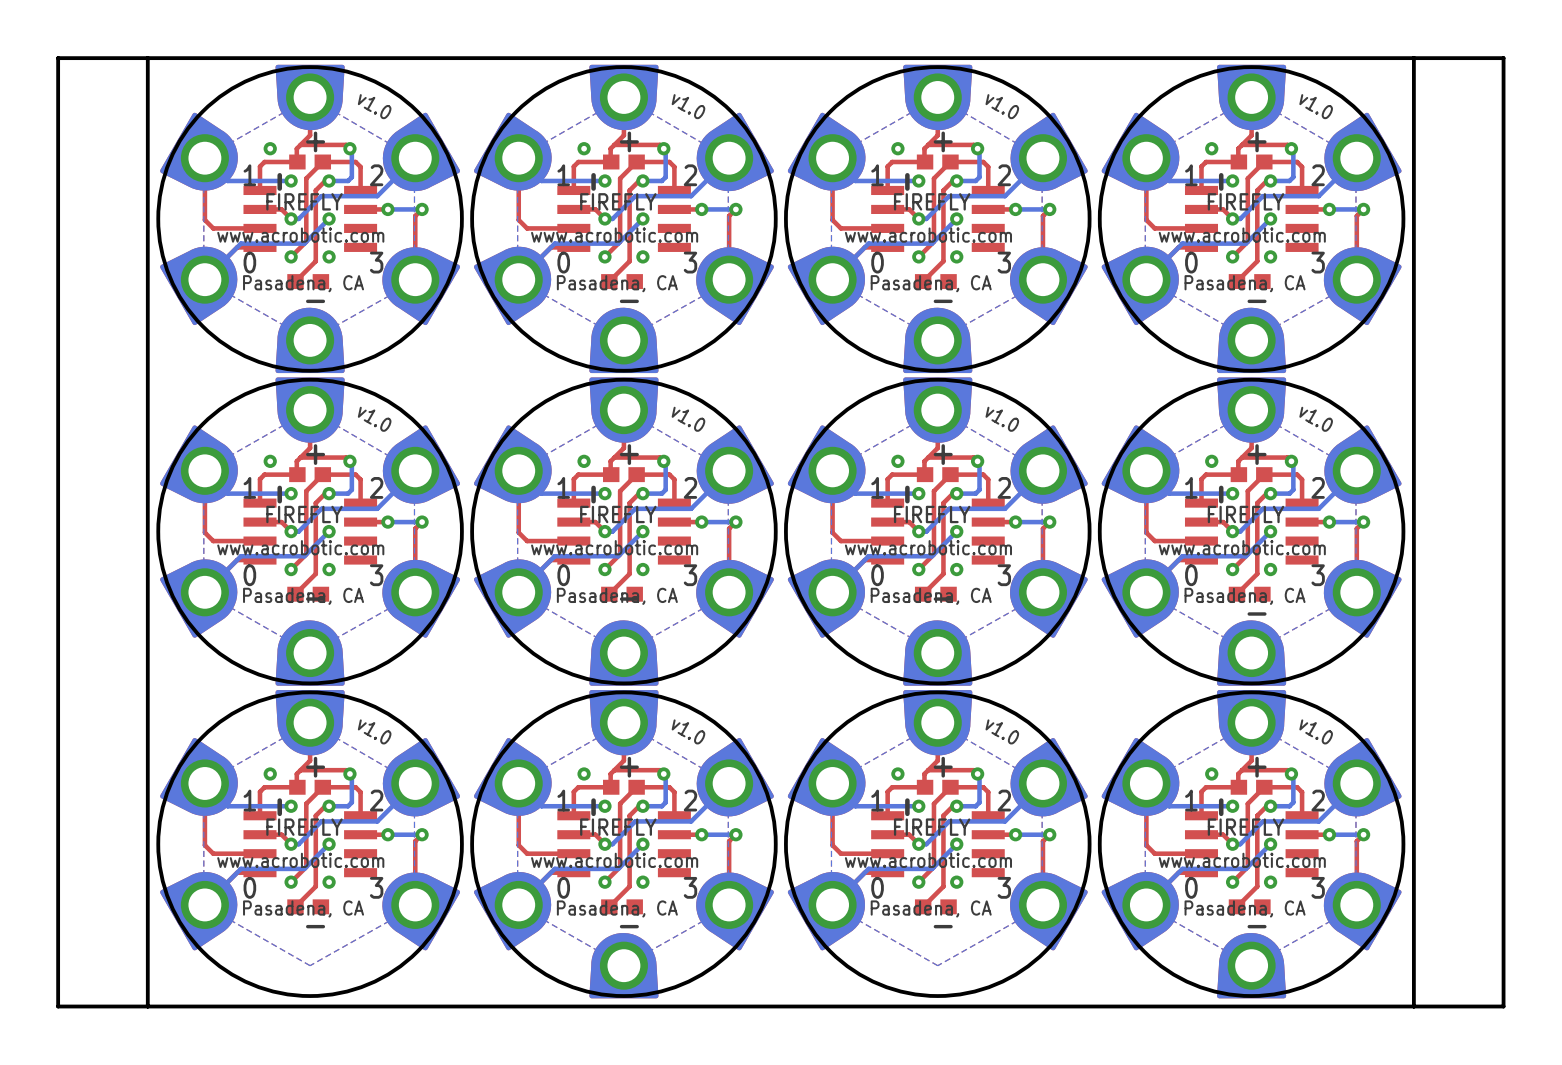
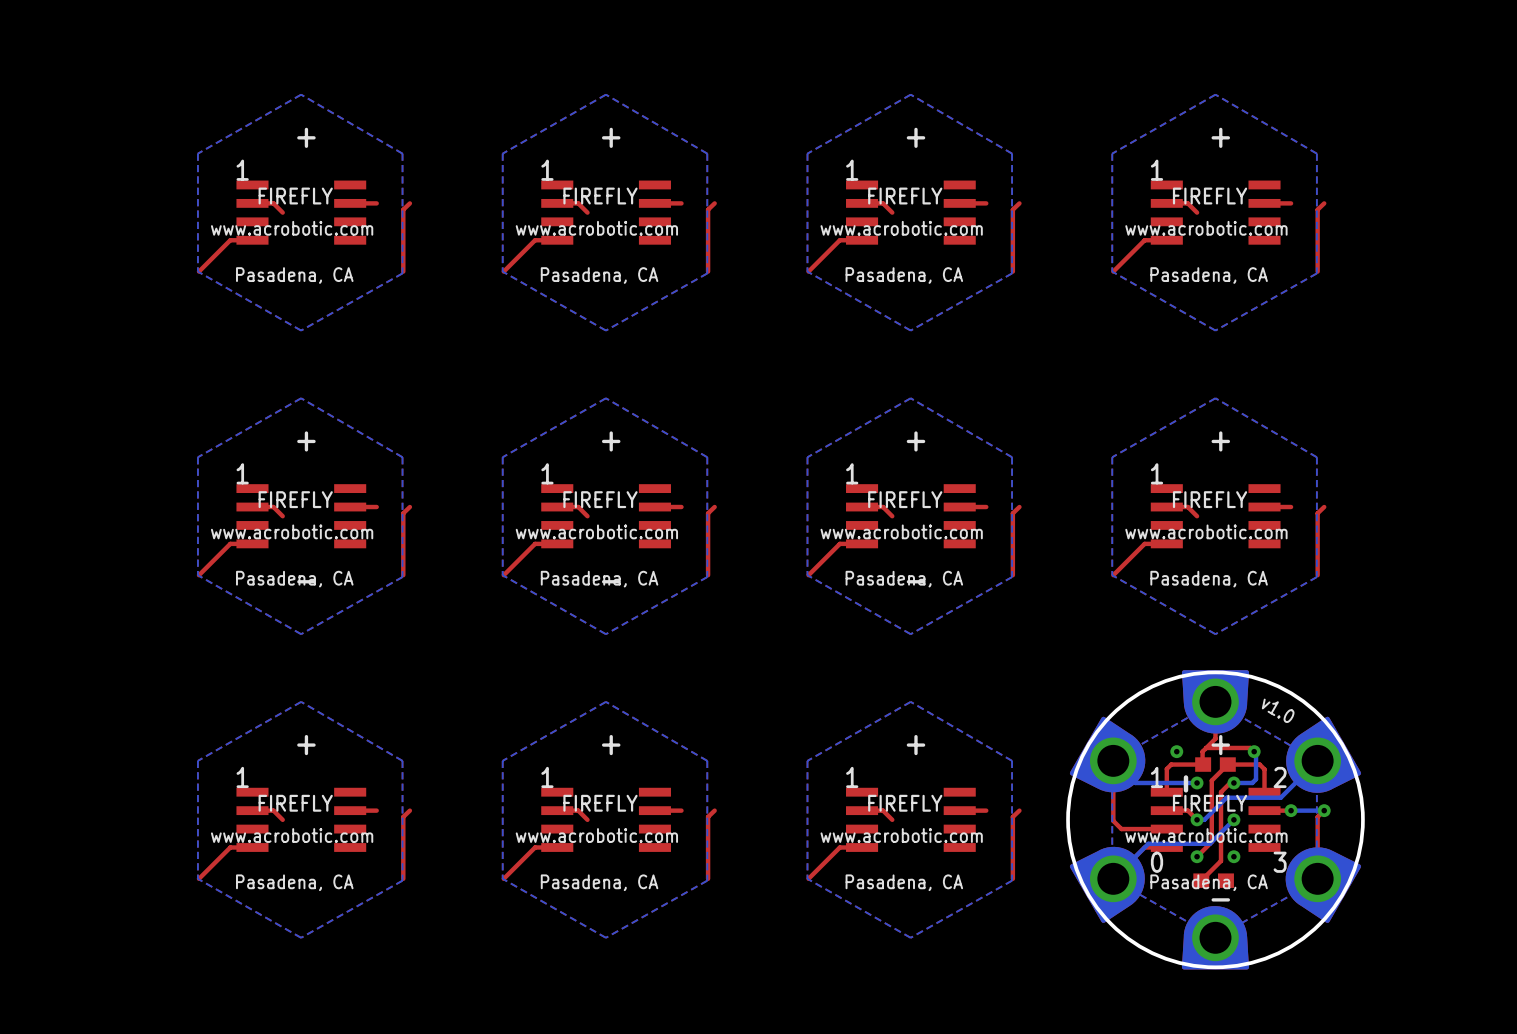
board edge: (147, 58) (147, 1006) -> none
board edge: (1413, 58) (1413, 1006) -> none
board edge: (1503, 58) (58, 58) (58, 1006) (1503, 1006) (1503, 58) -> none
round board edge: [156, 65, 464, 373] -> none
round board edge: [470, 65, 778, 373] -> none
round board edge: [784, 65, 1092, 373] -> none
round board edge: [1097, 65, 1406, 373] -> none
top track: (310, 97) (310, 135) (296, 148) (297, 161) (264, 161) (259, 166) (259, 190) -> none
part: (310, 97) -> none
top track: (623, 97) (623, 135) (610, 148) (611, 161) (578, 161) (573, 166) (573, 190) -> none
part: (623, 97) -> none
top track: (937, 97) (937, 135) (924, 148) (925, 161) (892, 161) (887, 166) (887, 190) -> none
part: (937, 97) -> none
top track: (1251, 97) (1251, 135) (1238, 148) (1238, 161) (1206, 161) (1201, 166) (1201, 190) -> none
part: (1251, 97) -> none
text: v1.0 (374, 106) -> none
text: v1.0 (688, 106) -> none
text: v1.0 (1002, 106) -> none
text: v1.0 (1316, 106) -> none
top track: (300, 144) (346, 144) (349, 148) -> none
top track: (614, 144) (659, 144) (663, 148) -> none
top track: (928, 144) (973, 144) (977, 148) -> none
top track: (1242, 144) (1287, 144) (1291, 148) -> none
via: (270, 148) -> none
bottom track: (349, 148) (351, 148) (351, 177) (348, 180) (329, 180) -> none
via: (349, 148) -> none
via: (584, 148) -> none
bottom track: (663, 148) (665, 148) (665, 177) (661, 180) (642, 180) -> none
via: (663, 148) -> none
via: (897, 148) -> none
bottom track: (977, 148) (979, 148) (979, 177) (975, 180) (956, 180) -> none
via: (977, 148) -> none
via: (1211, 148) -> none
bottom track: (1291, 148) (1293, 148) (1293, 177) (1289, 180) (1270, 180) -> none
via: (1291, 148) -> none
part: (198, 151) -> none
part: (421, 151) -> none
part: (512, 151) -> none
part: (735, 151) -> none
part: (826, 151) -> none
part: (1049, 151) -> none
part: (1140, 151) -> none
part: (1362, 151) -> none
top track: (204, 158) (204, 220) (213, 228) (259, 228) -> none
bottom track: (204, 158) (227, 180) (291, 180) -> none
bottom track: (415, 158) (377, 196) (321, 196) (298, 218) (291, 218) -> none
top track: (518, 158) (518, 220) (527, 228) (573, 228) -> none
bottom track: (518, 158) (541, 180) (604, 180) -> none
bottom track: (729, 158) (691, 196) (635, 196) (612, 218) (604, 218) -> none
top track: (832, 158) (832, 220) (840, 228) (887, 228) -> none
bottom track: (832, 158) (855, 180) (918, 180) -> none
bottom track: (1042, 158) (1005, 196) (949, 196) (926, 218) (918, 218) -> none
top track: (1146, 158) (1146, 220) (1154, 228) (1201, 228) -> none
bottom track: (1146, 158) (1169, 180) (1232, 180) -> none
bottom track: (1356, 158) (1318, 196) (1262, 196) (1240, 218) (1232, 218) -> none
part: (310, 161) -> none
part: (623, 161) -> none
part: (937, 161) -> none
part: (1251, 161) -> none
line: (279, 175) (279, 188) -> none
text: 2 (376, 175) -> none
line: (593, 175) (593, 188) -> none
text: 2 (690, 175) -> none
line: (907, 175) (907, 188) -> none
text: 2 (1004, 175) -> none
line: (1221, 175) (1221, 188) -> none
text: 2 (1318, 175) -> none
via: (291, 180) -> none
top track: (329, 180) (325, 180) (315, 190) (315, 261) (295, 281) -> none
via: (329, 180) -> none
via: (604, 180) -> none
top track: (642, 180) (639, 180) (629, 190) (629, 261) (609, 281) -> none
via: (642, 180) -> none
via: (918, 180) -> none
top track: (956, 180) (952, 180) (943, 190) (943, 261) (923, 281) -> none
via: (956, 180) -> none
via: (1232, 180) -> none
top track: (1270, 180) (1266, 180) (1257, 190) (1257, 261) (1236, 281) -> none
via: (1270, 180) -> none
top track: (360, 190) (360, 166) (355, 161) (322, 161) (306, 178) (306, 241) (291, 256) -> none
top track: (674, 190) (674, 166) (669, 161) (636, 161) (620, 178) (620, 241) (604, 256) -> none
top track: (988, 190) (988, 166) (983, 161) (950, 161) (933, 178) (933, 241) (918, 256) -> none
top track: (1302, 190) (1302, 166) (1297, 161) (1264, 161) (1247, 178) (1247, 241) (1232, 256) -> none
via: (387, 209) -> none
bottom track: (422, 209) (387, 209) -> none
via: (422, 209) -> none
via: (701, 209) -> none
bottom track: (735, 209) (701, 209) -> none
via: (735, 209) -> none
via: (1015, 209) -> none
bottom track: (1049, 209) (1015, 209) -> none
via: (1049, 209) -> none
via: (1329, 209) -> none
bottom track: (1363, 209) (1329, 209) -> none
via: (1363, 209) -> none
via: (291, 218) -> none
bottom track: (329, 218) (304, 243) (240, 243) (204, 279) -> none
via: (329, 218) -> none
via: (604, 218) -> none
bottom track: (642, 218) (618, 243) (554, 243) (518, 279) -> none
via: (642, 218) -> none
via: (918, 218) -> none
bottom track: (956, 218) (932, 243) (868, 243) (832, 279) -> none
via: (956, 218) -> none
via: (1232, 218) -> none
bottom track: (1270, 218) (1245, 243) (1182, 243) (1146, 279) -> none
via: (1270, 218) -> none
via: (291, 256) -> none
via: (329, 256) -> none
via: (604, 256) -> none
via: (642, 256) -> none
via: (918, 256) -> none
via: (956, 256) -> none
via: (1232, 256) -> none
via: (1270, 256) -> none
text: 0 (249, 262) -> none
text: 3 (376, 262) -> none
text: 0 (563, 262) -> none
text: 3 (690, 262) -> none
text: 0 (877, 262) -> none
text: 3 (1004, 262) -> none
text: 0 (1191, 262) -> none
text: 3 (1318, 262) -> none
part: (308, 281) -> none
part: (622, 281) -> none
part: (935, 281) -> none
part: (1249, 281) -> none
part: (198, 285) -> none
part: (512, 285) -> none
part: (826, 285) -> none
part: (1140, 285) -> none
part: (421, 286) -> none
part: (735, 286) -> none
part: (1048, 286) -> none
part: (1362, 286) -> none
text: - (315, 301) -> none
text: - (629, 301) -> none
text: - (943, 301) -> none
text: - (1257, 301) -> none
part: (310, 340) -> none
part: (623, 340) -> none
part: (937, 340) -> none
part: (1251, 340) -> none
round board edge: [156, 377, 464, 686] -> none
round board edge: [470, 377, 778, 686] -> none
round board edge: [784, 377, 1092, 686] -> none
round board edge: [1097, 377, 1406, 686] -> none
top track: (310, 410) (310, 448) (296, 461) (297, 474) (264, 474) (259, 479) (259, 503) -> none
part: (310, 410) -> none
top track: (623, 410) (623, 448) (610, 461) (611, 474) (578, 474) (573, 479) (573, 503) -> none
part: (623, 410) -> none
top track: (937, 410) (937, 448) (924, 461) (925, 474) (892, 474) (887, 479) (887, 503) -> none
part: (937, 410) -> none
top track: (1251, 410) (1251, 448) (1238, 461) (1238, 474) (1206, 474) (1201, 479) (1201, 503) -> none
part: (1251, 410) -> none
text: v1.0 (374, 419) -> none
text: v1.0 (688, 419) -> none
text: v1.0 (1002, 419) -> none
text: v1.0 (1316, 419) -> none
top track: (300, 457) (346, 457) (349, 461) -> none
top track: (614, 457) (659, 457) (663, 461) -> none
top track: (928, 457) (973, 457) (977, 461) -> none
top track: (1242, 457) (1287, 457) (1291, 461) -> none
via: (270, 461) -> none
bottom track: (349, 461) (351, 461) (351, 489) (348, 493) (329, 493) -> none
via: (349, 461) -> none
via: (584, 461) -> none
bottom track: (663, 461) (665, 461) (665, 489) (661, 493) (642, 493) -> none
via: (663, 461) -> none
via: (897, 461) -> none
bottom track: (977, 461) (979, 461) (979, 489) (975, 493) (956, 493) -> none
via: (977, 461) -> none
via: (1211, 461) -> none
bottom track: (1291, 461) (1293, 461) (1293, 489) (1289, 493) (1270, 493) -> none
via: (1291, 461) -> none
part: (198, 464) -> none
part: (421, 464) -> none
part: (512, 464) -> none
part: (735, 464) -> none
part: (826, 464) -> none
part: (1049, 464) -> none
part: (1140, 464) -> none
part: (1362, 464) -> none
top track: (204, 470) (204, 532) (213, 541) (259, 541) -> none
bottom track: (204, 470) (227, 493) (291, 493) -> none
bottom track: (415, 470) (377, 508) (321, 508) (298, 531) (291, 531) -> none
top track: (518, 470) (518, 532) (527, 541) (573, 541) -> none
bottom track: (518, 470) (541, 493) (604, 493) -> none
bottom track: (729, 470) (691, 508) (635, 508) (612, 531) (604, 531) -> none
top track: (832, 470) (832, 532) (840, 541) (887, 541) -> none
bottom track: (832, 470) (855, 493) (918, 493) -> none
bottom track: (1042, 470) (1005, 508) (949, 508) (926, 531) (918, 531) -> none
top track: (1146, 470) (1146, 532) (1154, 541) (1201, 541) -> none
bottom track: (1146, 470) (1169, 493) (1232, 493) -> none
bottom track: (1356, 470) (1318, 508) (1262, 508) (1240, 531) (1232, 531) -> none
part: (310, 474) -> none
part: (623, 474) -> none
part: (937, 474) -> none
part: (1251, 474) -> none
line: (279, 487) (279, 501) -> none
text: 2 (376, 487) -> none
line: (593, 487) (593, 501) -> none
text: 2 (690, 487) -> none
line: (907, 487) (907, 501) -> none
text: 2 (1004, 487) -> none
line: (1221, 487) (1221, 501) -> none
text: 2 (1318, 487) -> none
via: (291, 493) -> none
top track: (329, 493) (325, 493) (315, 503) (315, 573) (295, 594) -> none
via: (329, 493) -> none
via: (604, 493) -> none
top track: (642, 493) (639, 493) (629, 503) (629, 573) (609, 594) -> none
via: (642, 493) -> none
via: (918, 493) -> none
top track: (956, 493) (952, 493) (943, 503) (943, 573) (923, 594) -> none
via: (956, 493) -> none
via: (1232, 493) -> none
top track: (1270, 493) (1266, 493) (1257, 503) (1257, 573) (1236, 594) -> none
via: (1270, 493) -> none
top track: (360, 503) (360, 479) (355, 474) (322, 474) (306, 491) (306, 554) (291, 569) -> none
top track: (674, 503) (674, 479) (669, 474) (636, 474) (620, 491) (620, 554) (604, 569) -> none
top track: (988, 503) (988, 479) (983, 474) (950, 474) (933, 491) (933, 554) (918, 569) -> none
top track: (1302, 503) (1302, 479) (1297, 474) (1264, 474) (1247, 491) (1247, 554) (1232, 569) -> none
via: (387, 522) -> none
bottom track: (422, 522) (387, 522) -> none
via: (422, 522) -> none
via: (701, 522) -> none
bottom track: (735, 522) (701, 522) -> none
via: (735, 522) -> none
via: (1015, 522) -> none
bottom track: (1049, 522) (1015, 522) -> none
via: (1049, 522) -> none
via: (1329, 522) -> none
bottom track: (1363, 522) (1329, 522) -> none
via: (1363, 522) -> none
via: (291, 531) -> none
bottom track: (329, 531) (304, 556) (240, 556) (204, 592) -> none
via: (329, 531) -> none
via: (604, 531) -> none
bottom track: (642, 531) (618, 556) (554, 556) (518, 592) -> none
via: (642, 531) -> none
via: (918, 531) -> none
bottom track: (956, 531) (932, 556) (868, 556) (832, 592) -> none
via: (956, 531) -> none
via: (1232, 531) -> none
bottom track: (1270, 531) (1245, 556) (1182, 556) (1146, 592) -> none
via: (1270, 531) -> none
via: (291, 569) -> none
via: (329, 569) -> none
via: (604, 569) -> none
via: (642, 569) -> none
via: (918, 569) -> none
via: (956, 569) -> none
via: (1232, 569) -> none
via: (1270, 569) -> none
text: 0 (249, 575) -> none
text: 3 (376, 575) -> none
text: 0 (563, 575) -> none
text: 3 (690, 575) -> none
text: 0 (877, 575) -> none
text: 3 (1004, 575) -> none
text: 0 (1191, 575) -> none
text: 3 (1318, 575) -> none
part: (308, 594) -> none
part: (622, 594) -> none
part: (935, 594) -> none
part: (1249, 594) -> none
part: (198, 598) -> none
part: (421, 598) -> none
part: (512, 598) -> none
part: (735, 598) -> none
part: (826, 598) -> none
part: (1048, 598) -> none
part: (1140, 598) -> none
part: (1362, 598) -> none
text: - (1257, 613) -> none
part: (310, 653) -> none
part: (623, 653) -> none
part: (937, 653) -> none
part: (1251, 653) -> none
round board edge: [156, 690, 464, 998] -> none
round board edge: [470, 690, 778, 998] -> none
round board edge: [784, 690, 1092, 998] -> none
top track: (310, 722) (310, 760) (296, 773) (297, 787) (264, 787) (259, 791) (259, 815) -> none
part: (310, 722) -> none
top track: (623, 722) (623, 760) (610, 773) (611, 787) (578, 787) (573, 791) (573, 815) -> none
part: (623, 722) -> none
top track: (937, 722) (937, 760) (924, 773) (925, 787) (892, 787) (887, 791) (887, 815) -> none
part: (937, 722) -> none
text: v1.0 (374, 731) -> none
text: v1.0 (688, 731) -> none
text: v1.0 (1002, 731) -> none
top track: (300, 770) (346, 770) (349, 773) -> none
top track: (614, 770) (659, 770) (663, 773) -> none
top track: (928, 770) (973, 770) (977, 773) -> none
via: (270, 773) -> none
bottom track: (349, 773) (351, 773) (351, 802) (348, 806) (329, 806) -> none
via: (349, 773) -> none
via: (584, 773) -> none
bottom track: (663, 773) (665, 773) (665, 802) (661, 806) (642, 806) -> none
via: (663, 773) -> none
via: (897, 773) -> none
bottom track: (977, 773) (979, 773) (979, 802) (975, 806) (956, 806) -> none
via: (977, 773) -> none
part: (198, 776) -> none
part: (512, 776) -> none
part: (826, 776) -> none
part: (421, 777) -> none
part: (735, 777) -> none
part: (1049, 777) -> none
top track: (204, 783) (204, 845) (213, 853) (259, 853) -> none
bottom track: (204, 783) (227, 806) (291, 806) -> none
bottom track: (415, 783) (377, 821) (321, 821) (298, 844) (291, 844) -> none
top track: (518, 783) (518, 845) (527, 853) (573, 853) -> none
bottom track: (518, 783) (541, 806) (604, 806) -> none
bottom track: (729, 783) (691, 821) (635, 821) (612, 844) (604, 844) -> none
top track: (832, 783) (832, 845) (840, 853) (887, 853) -> none
bottom track: (832, 783) (855, 806) (918, 806) -> none
bottom track: (1042, 783) (1005, 821) (949, 821) (926, 844) (918, 844) -> none
part: (310, 787) -> none
part: (623, 787) -> none
part: (937, 787) -> none
line: (279, 800) (279, 813) -> none
text: 2 (376, 800) -> none
line: (593, 800) (593, 813) -> none
text: 2 (690, 800) -> none
line: (907, 800) (907, 813) -> none
text: 2 (1004, 800) -> none
via: (291, 806) -> none
top track: (329, 806) (325, 806) (315, 815) (315, 886) (295, 906) -> none
via: (329, 806) -> none
via: (604, 806) -> none
top track: (642, 806) (639, 806) (629, 815) (629, 886) (609, 906) -> none
via: (642, 806) -> none
via: (918, 806) -> none
top track: (956, 806) (952, 806) (943, 815) (943, 886) (923, 906) -> none
via: (956, 806) -> none
top track: (360, 815) (360, 792) (355, 787) (322, 787) (306, 803) (306, 866) (291, 882) -> none
top track: (674, 815) (674, 792) (669, 787) (636, 787) (620, 803) (620, 866) (604, 882) -> none
top track: (988, 815) (988, 792) (983, 787) (950, 787) (933, 803) (933, 866) (918, 882) -> none
via: (387, 834) -> none
bottom track: (422, 834) (387, 834) -> none
via: (422, 834) -> none
via: (701, 834) -> none
bottom track: (735, 834) (701, 834) -> none
via: (735, 834) -> none
via: (1015, 834) -> none
bottom track: (1049, 834) (1015, 834) -> none
via: (1049, 834) -> none
via: (291, 844) -> none
bottom track: (329, 844) (304, 868) (240, 868) (204, 904) -> none
via: (329, 844) -> none
via: (604, 844) -> none
bottom track: (642, 844) (618, 868) (554, 868) (518, 904) -> none
via: (642, 844) -> none
via: (918, 844) -> none
bottom track: (956, 844) (932, 868) (868, 868) (832, 904) -> none
via: (956, 844) -> none
via: (291, 882) -> none
via: (329, 882) -> none
via: (604, 882) -> none
via: (642, 882) -> none
via: (918, 882) -> none
via: (956, 882) -> none
text: 0 (249, 887) -> none
text: 3 (376, 887) -> none
text: 0 (563, 887) -> none
text: 3 (690, 887) -> none
text: 0 (877, 887) -> none
text: 3 (1004, 887) -> none
part: (308, 906) -> none
part: (622, 906) -> none
part: (935, 906) -> none
part: (198, 911) -> none
part: (421, 911) -> none
part: (512, 911) -> none
part: (735, 911) -> none
part: (826, 911) -> none
part: (1048, 911) -> none
text: - (315, 926) -> none
text: - (629, 926) -> none
text: - (943, 926) -> none
part: (623, 965) -> none

